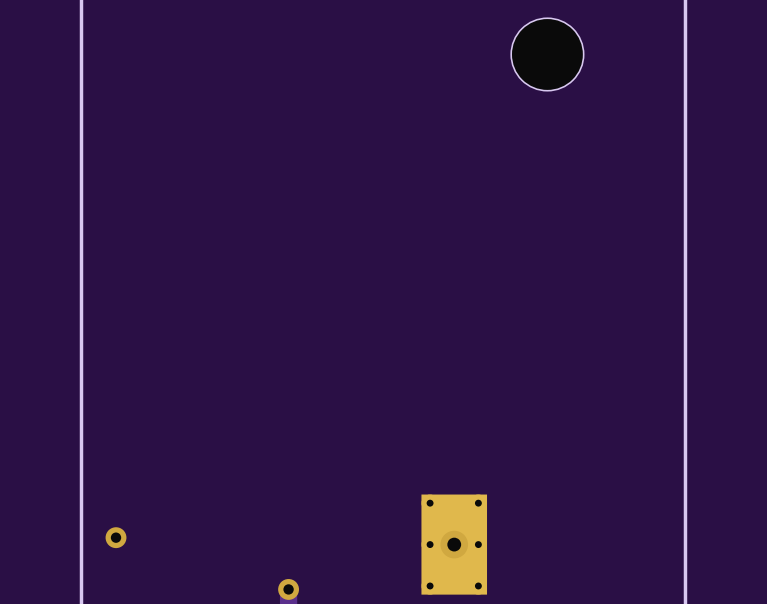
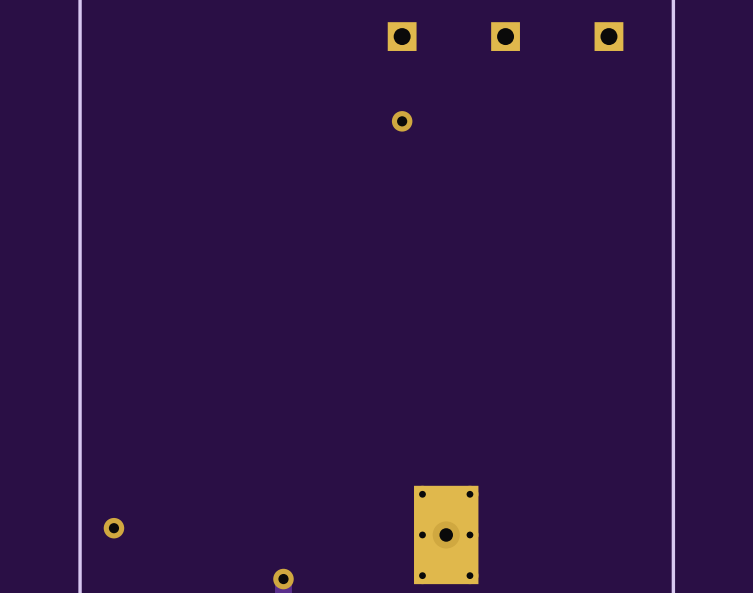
part: none -> (402, 36)
part: none -> (505, 36)
part: none -> (608, 36)
part: (547, 54) -> none
via: none -> (402, 121)

